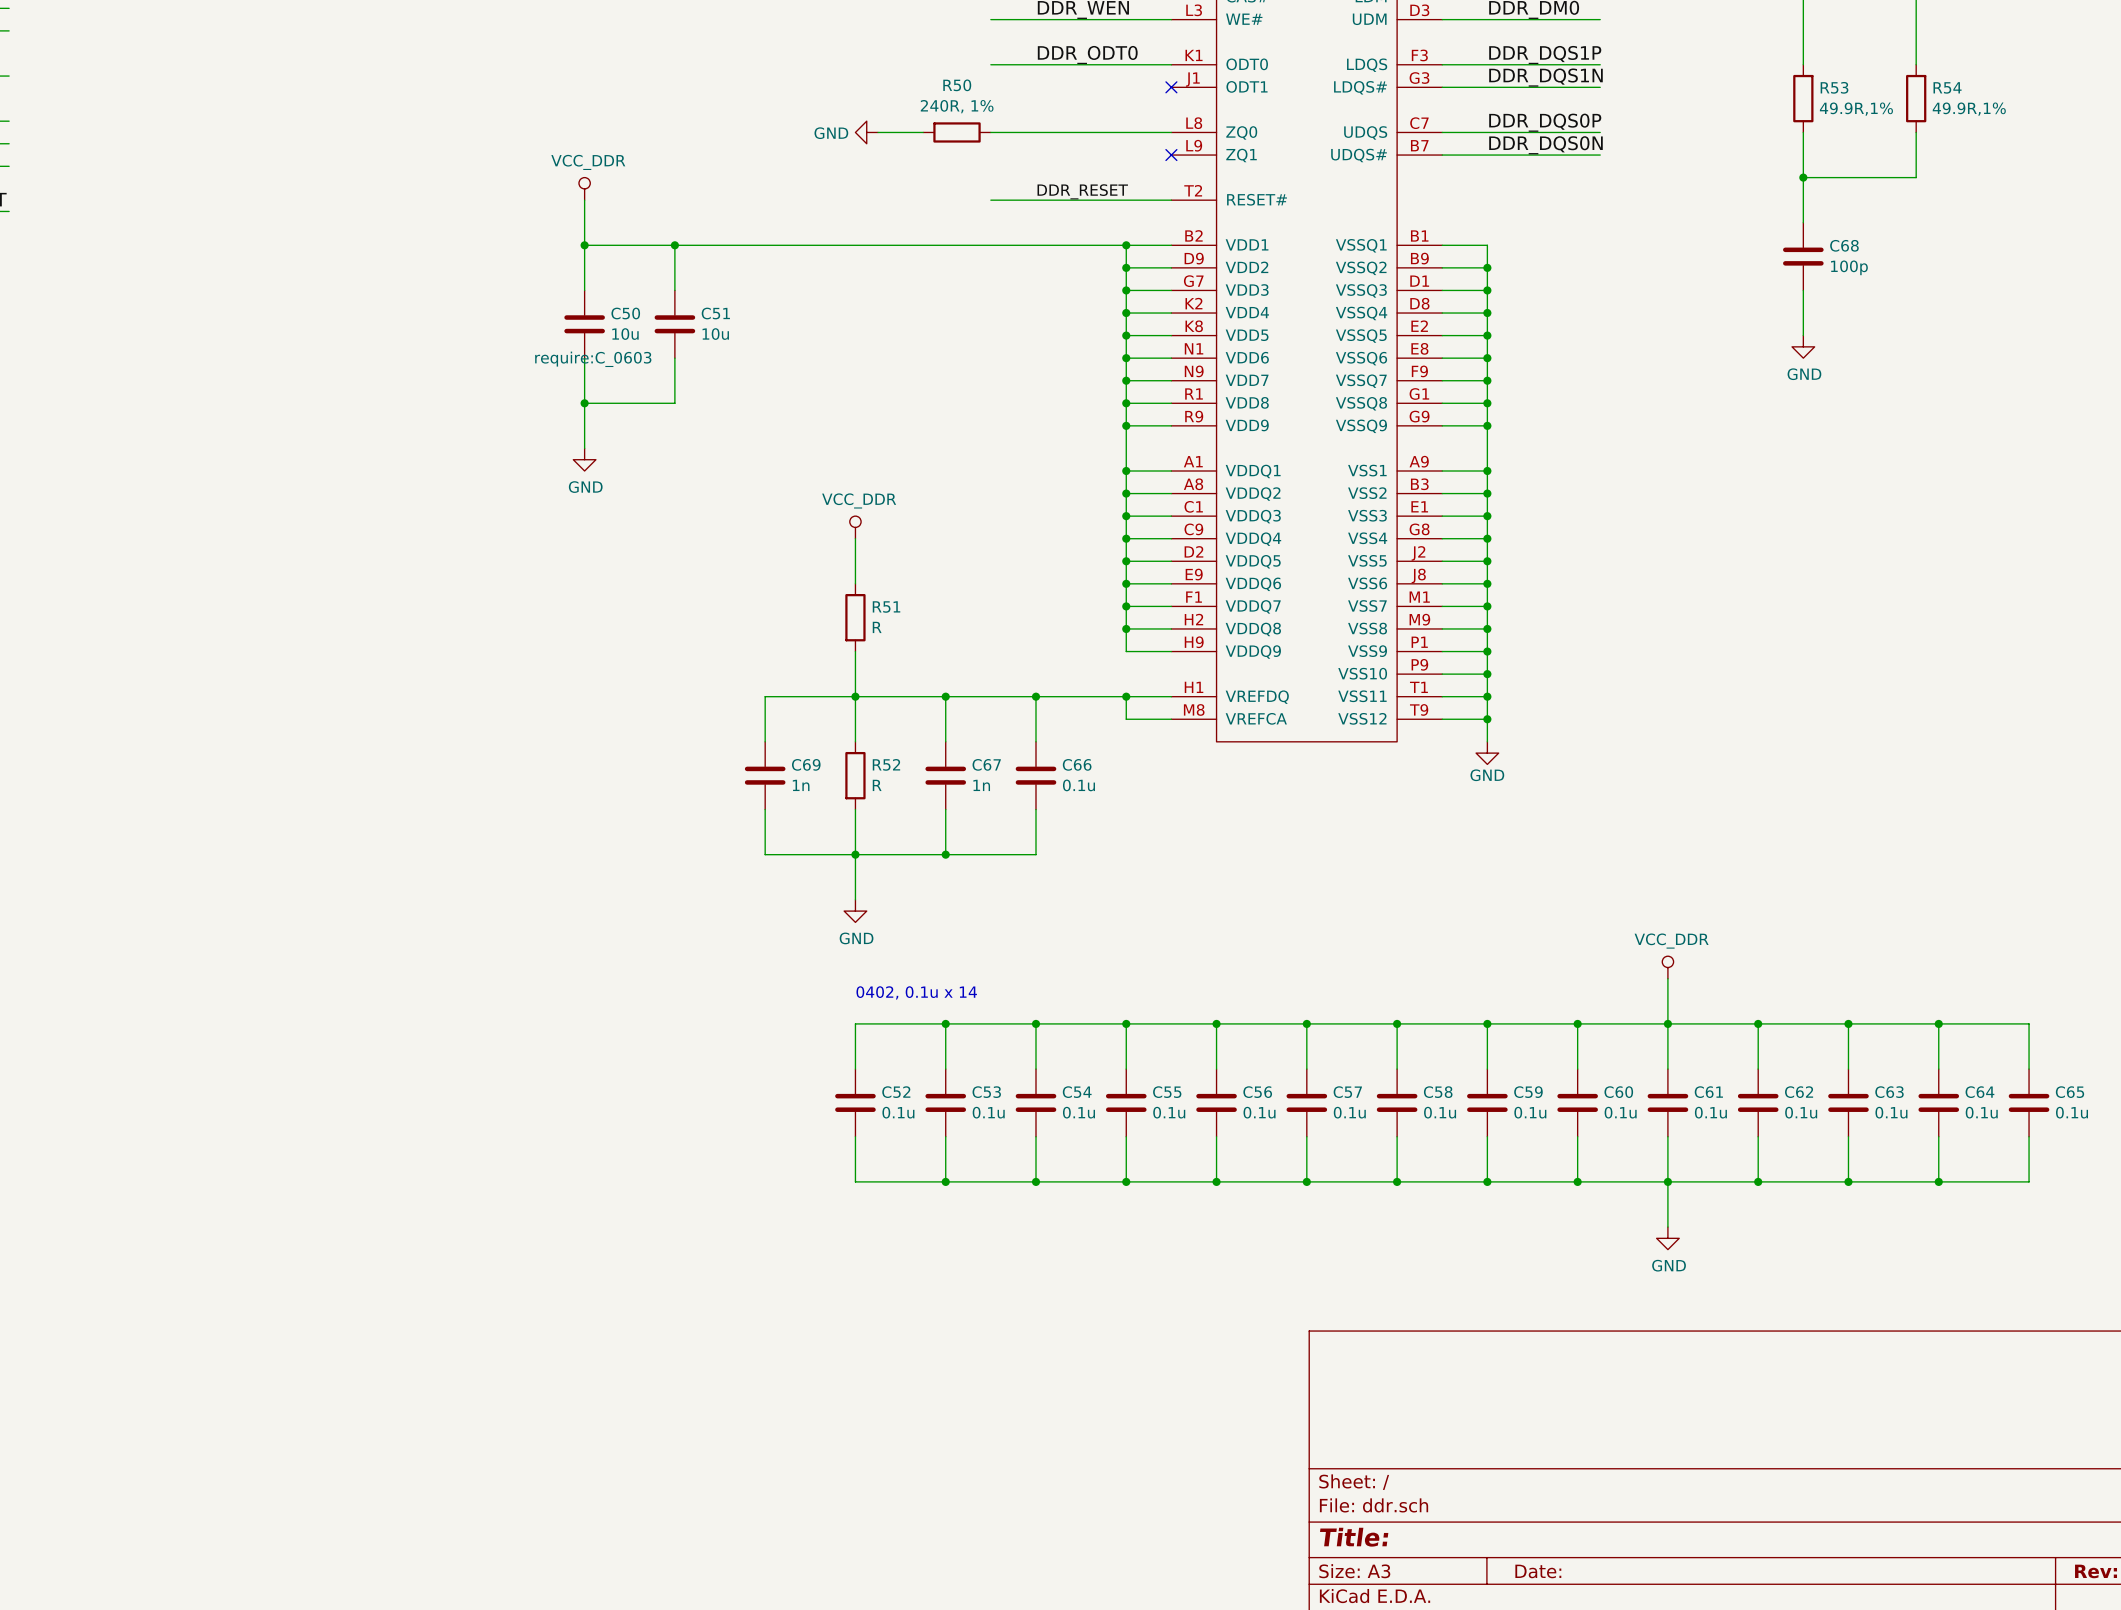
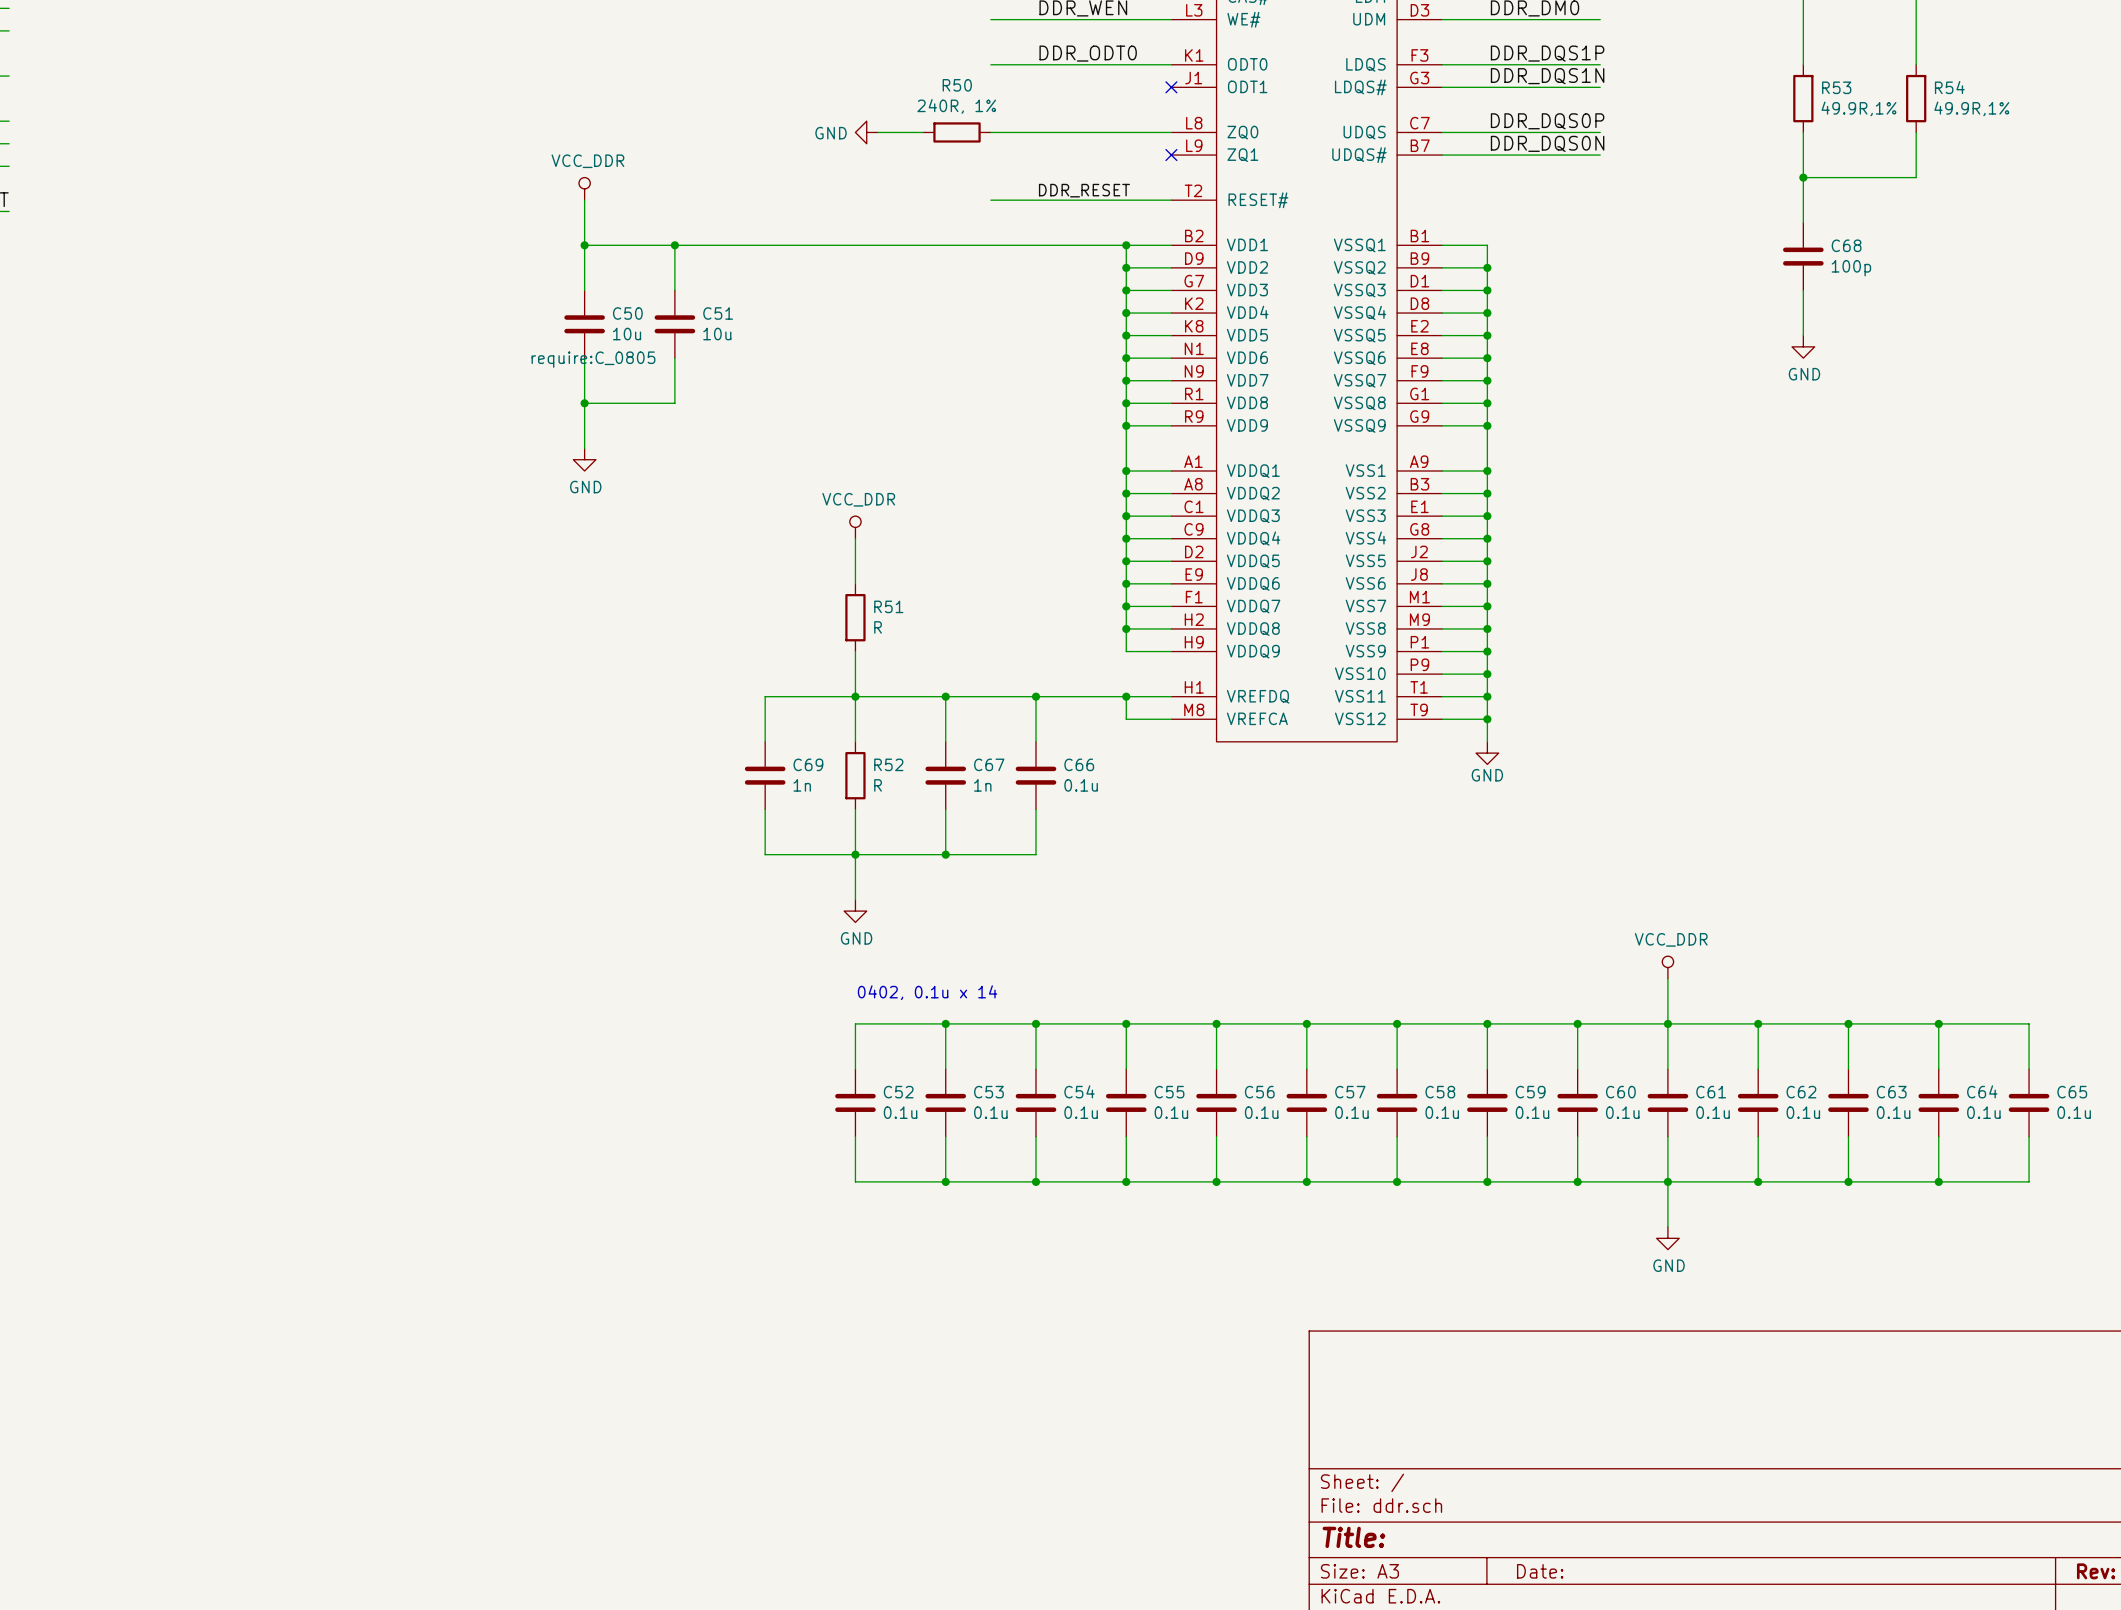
C50 text: require:C_0603 (593, 359) -> require:C_0805 (593, 359)

